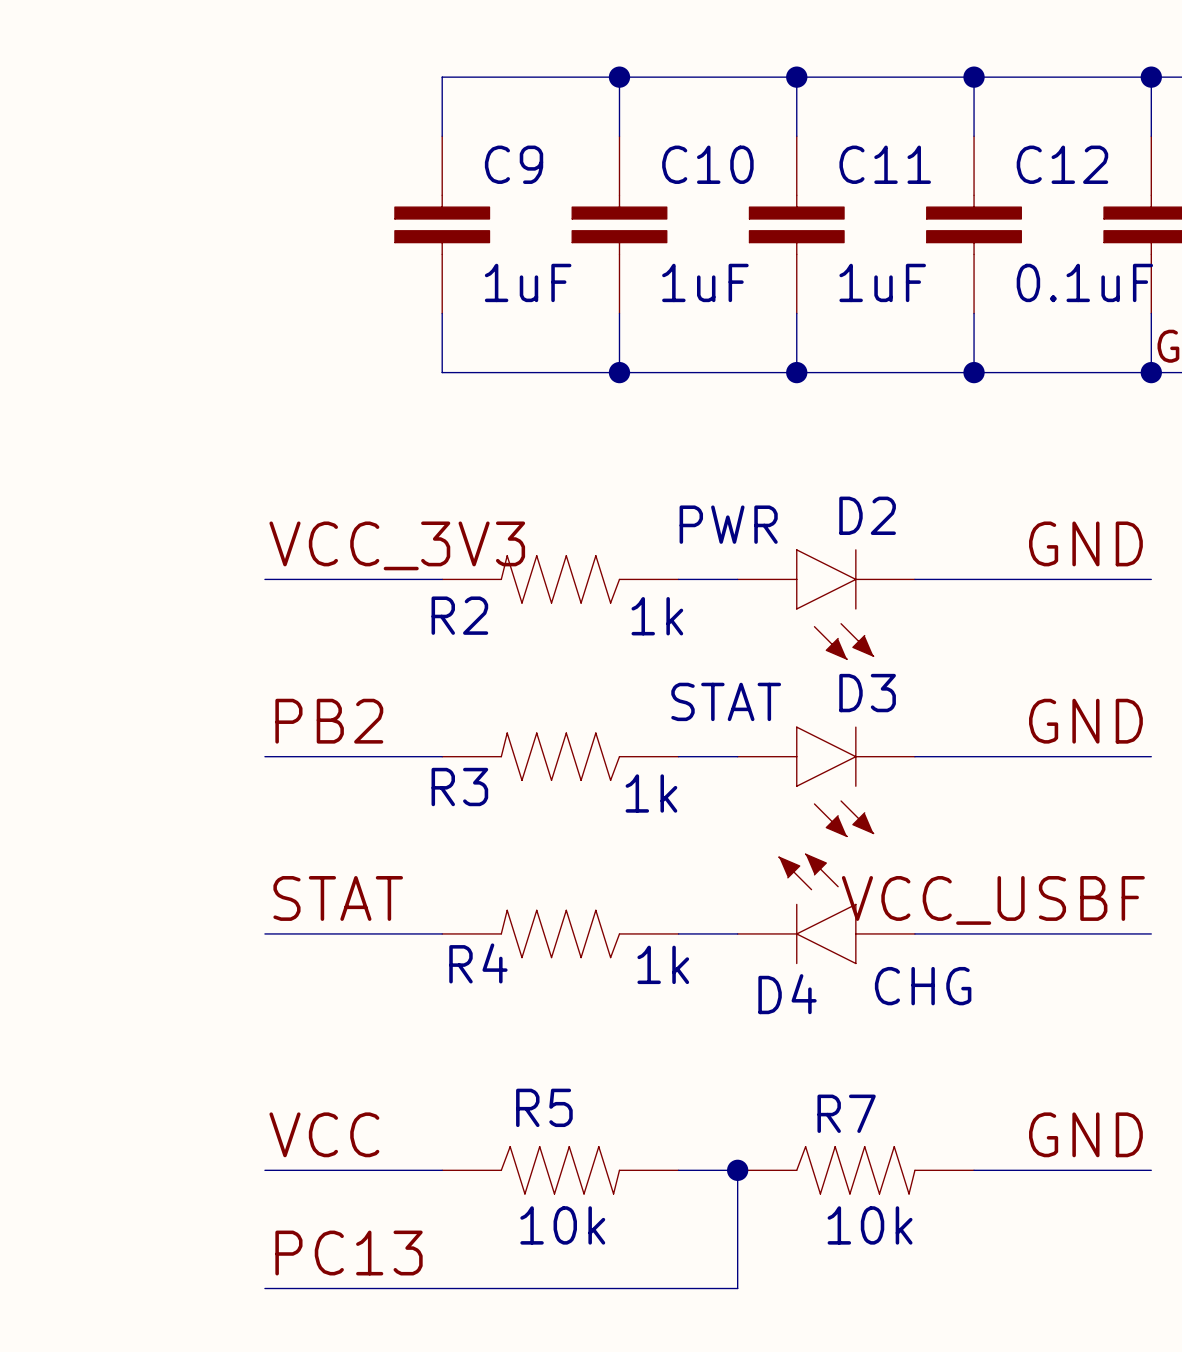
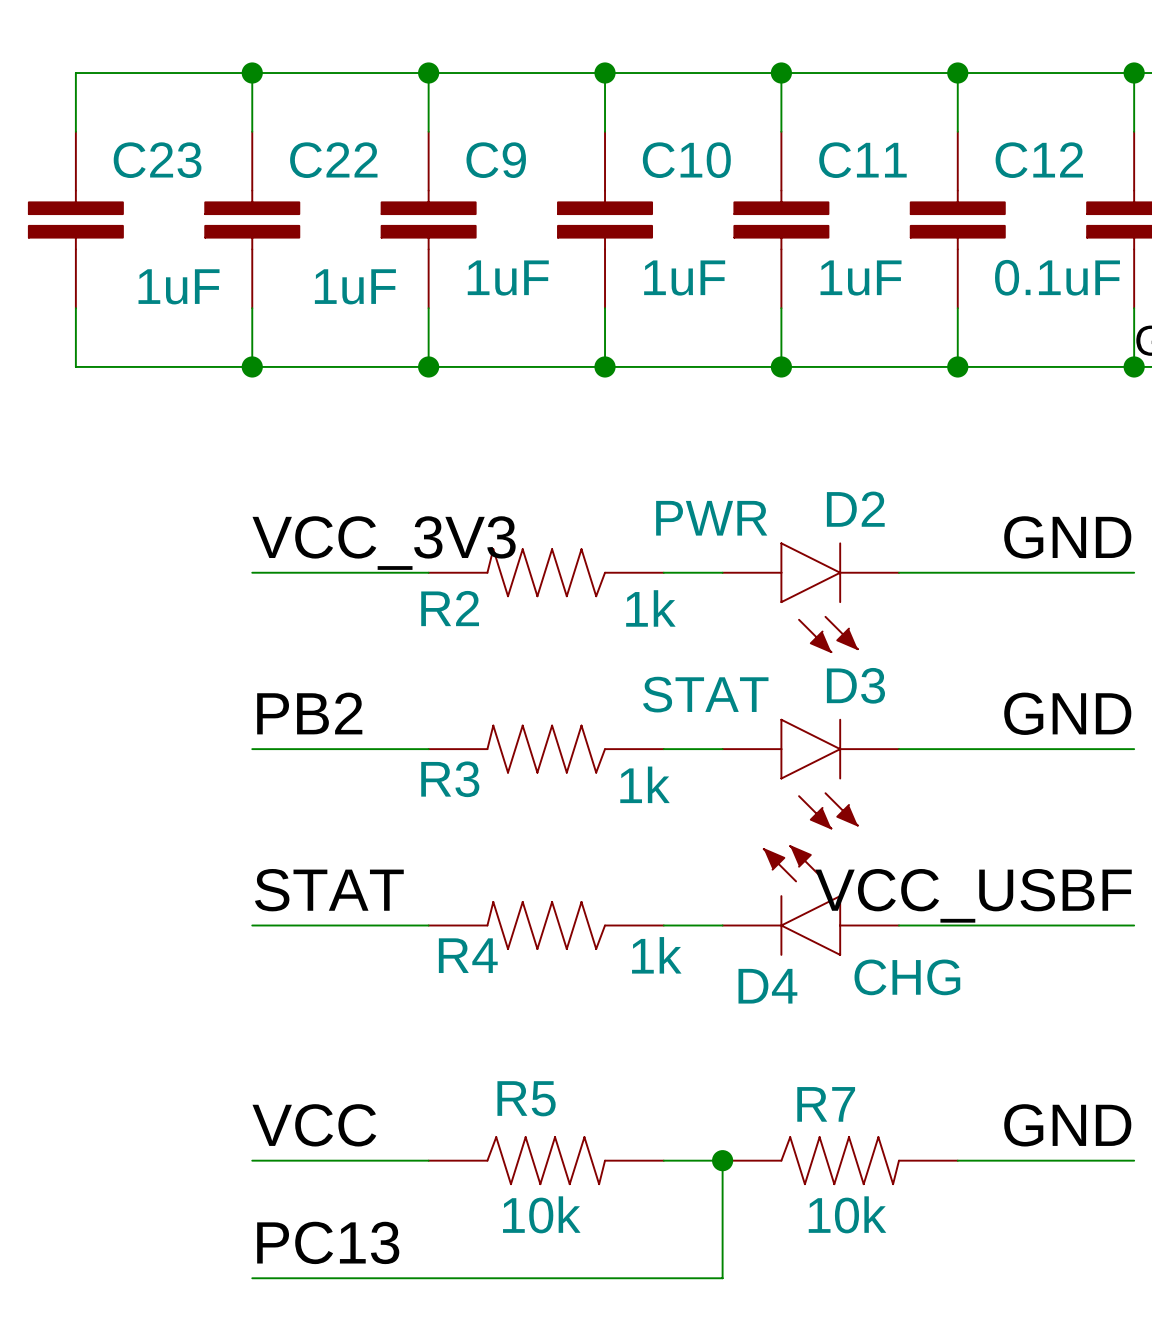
wire: none -> (252, 73) (252, 131)
junction: none -> (252, 73)
wire: none -> (428, 73) (75, 73) (75, 131)
junction: none -> (428, 73)
C23: none -> 1uF (75, 219)
C22: none -> 1uF (252, 219)
wire: none -> (75, 308) (75, 366) (428, 366)
wire: none -> (252, 308) (252, 366)
junction: none -> (252, 366)
junction: none -> (428, 366)

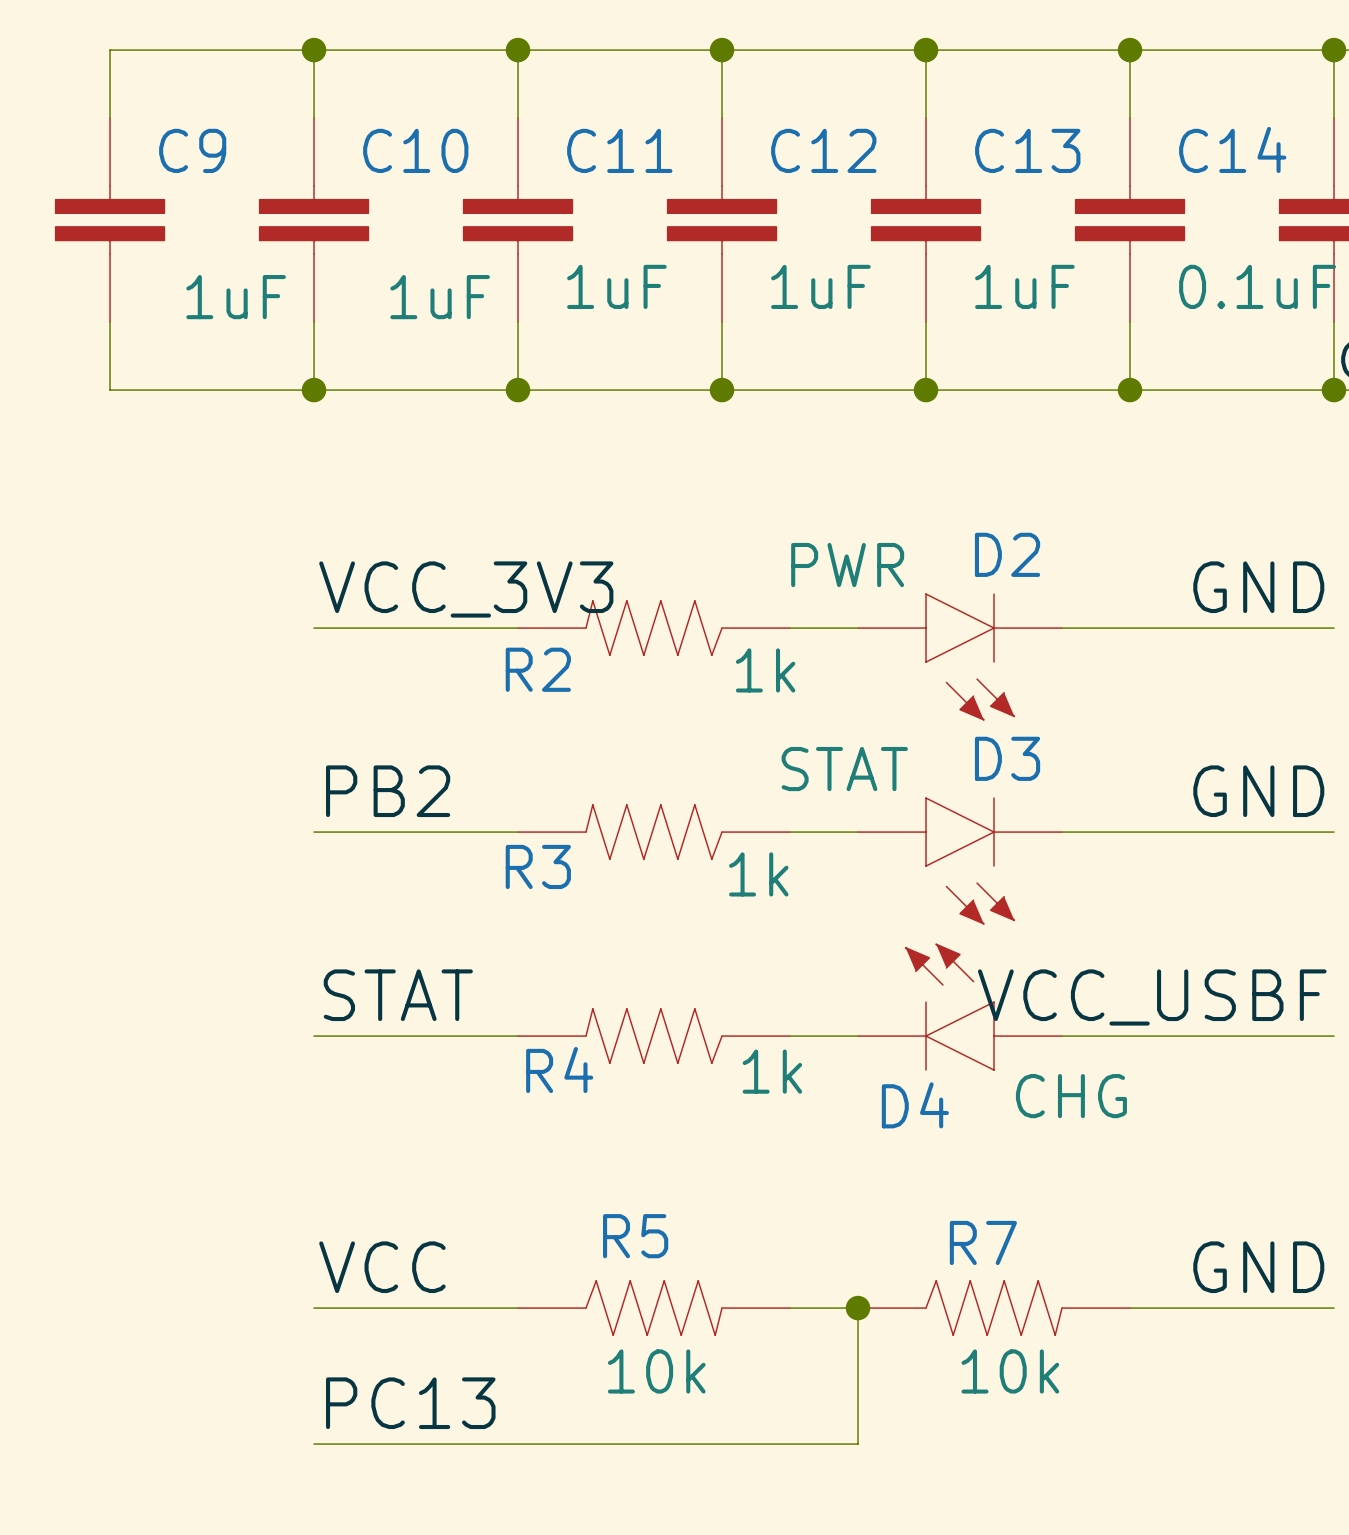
C23 name: C23 (157, 160) -> C9 (192, 150)
C22 name: C22 (333, 160) -> C10 (415, 150)
C9 name: C9 (496, 160) -> C11 (619, 150)
C10 name: C10 (686, 160) -> C12 (823, 150)
C11 name: C11 (862, 160) -> C13 (1027, 150)
C12 name: C12 (1039, 160) -> C14 (1232, 149)

